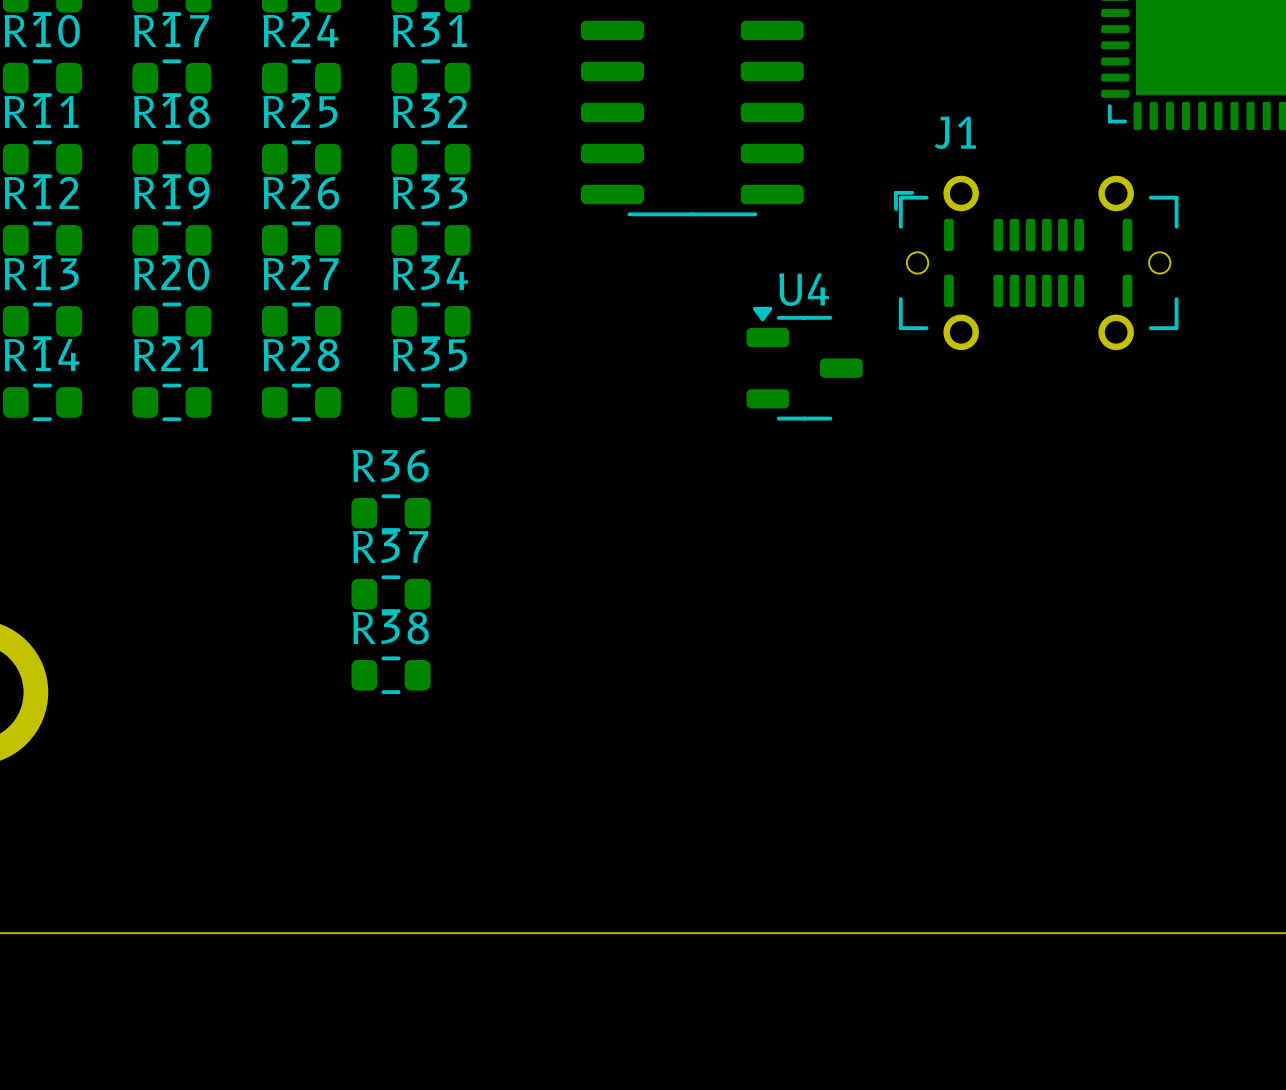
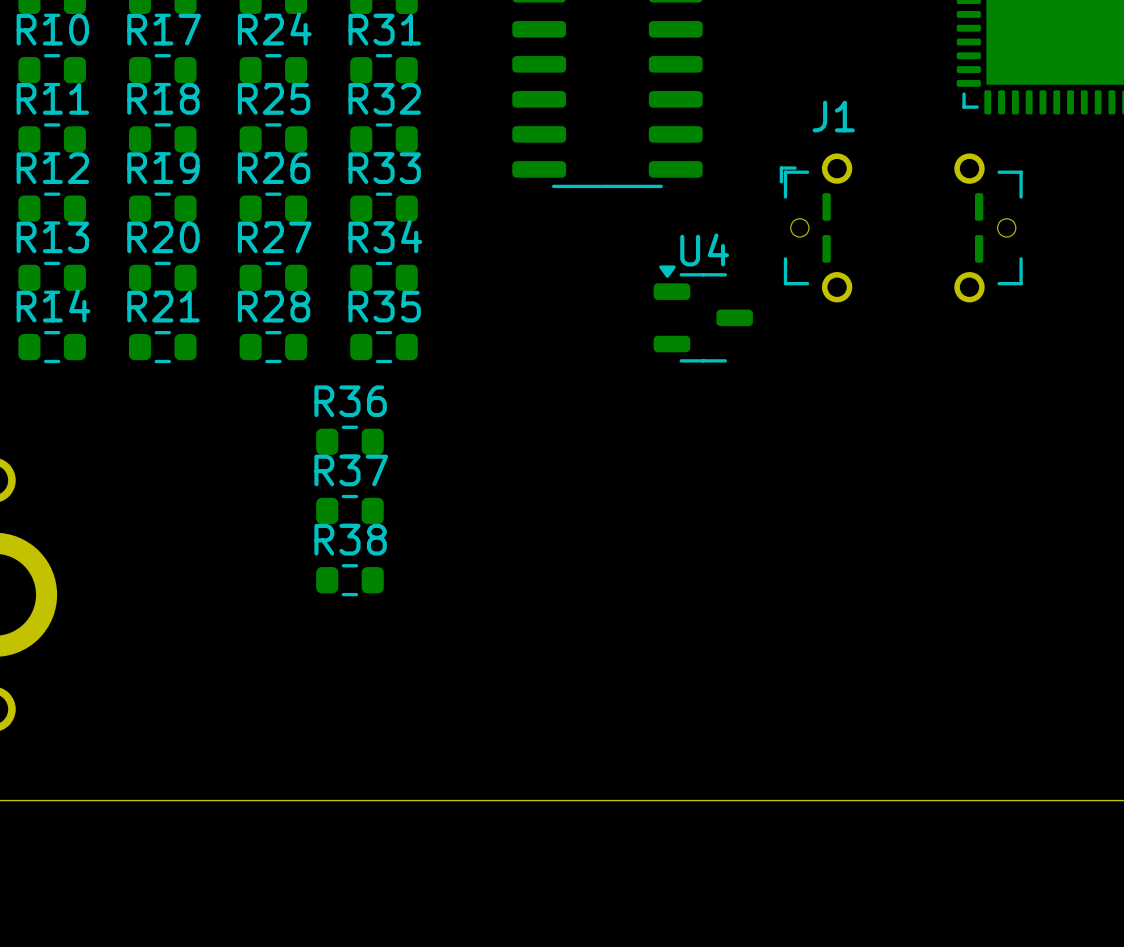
J1 footprint: [894, 175, 1179, 351] -> [779, 153, 1023, 303]

